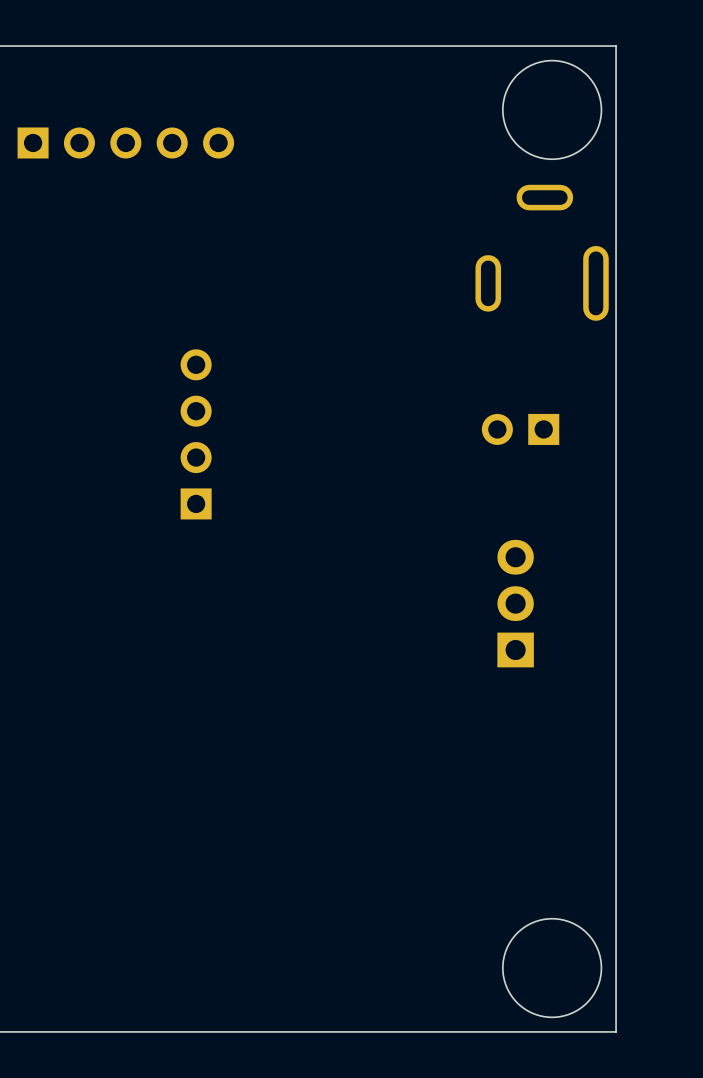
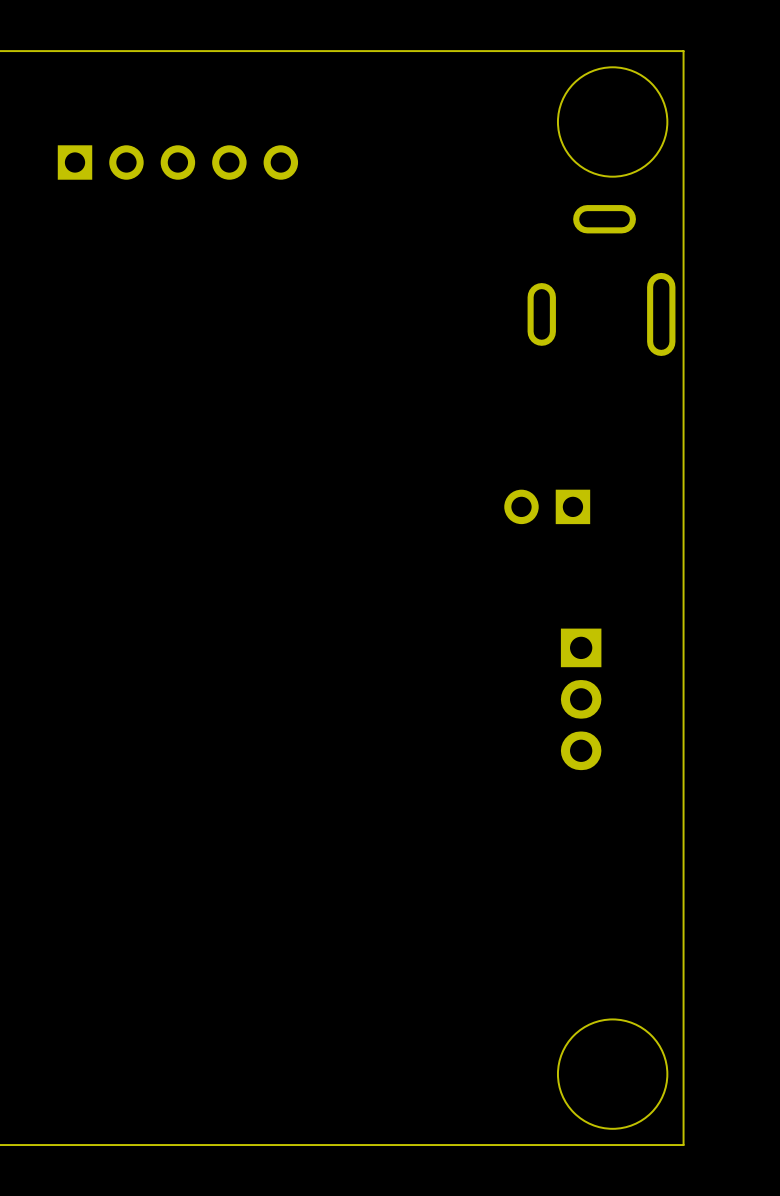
part position: (125, 142) -> (177, 162)
part position: (520, 429) -> (547, 506)
part: (196, 434) -> none
part rotation: 0° (515, 603) -> 180° (581, 699)

